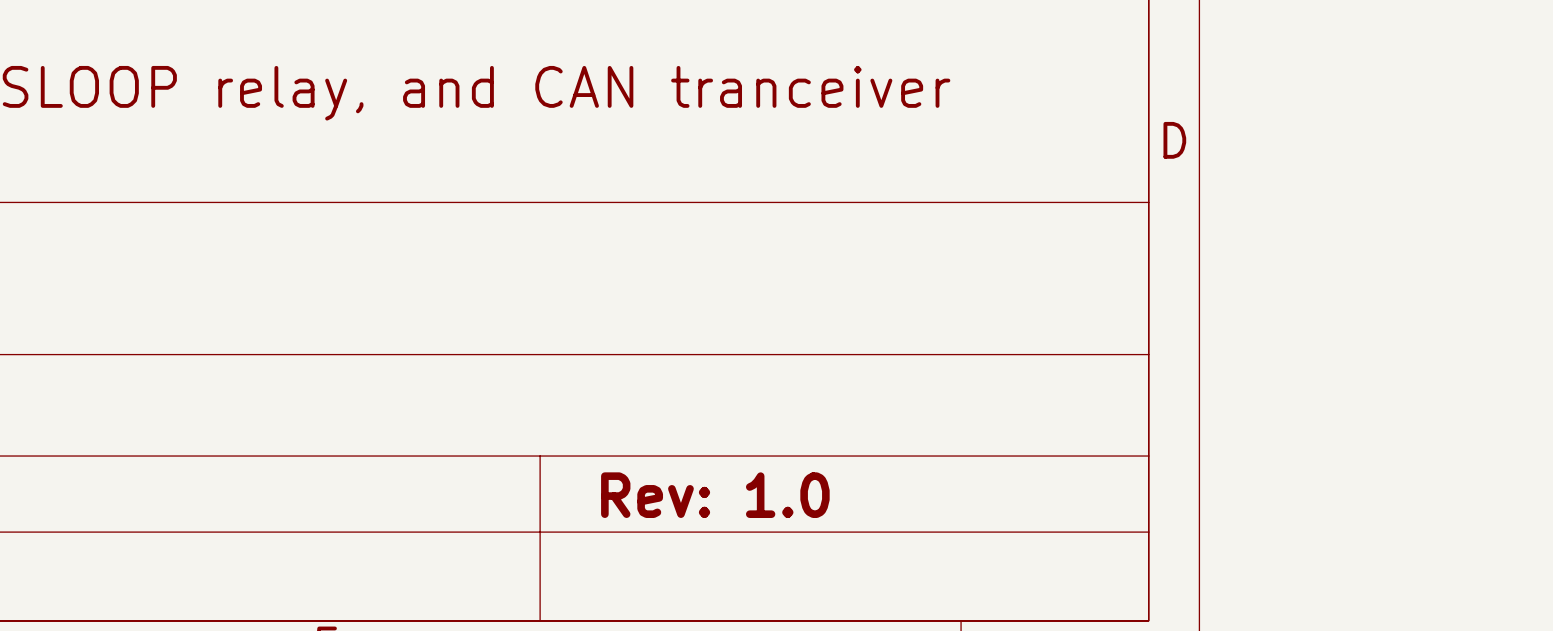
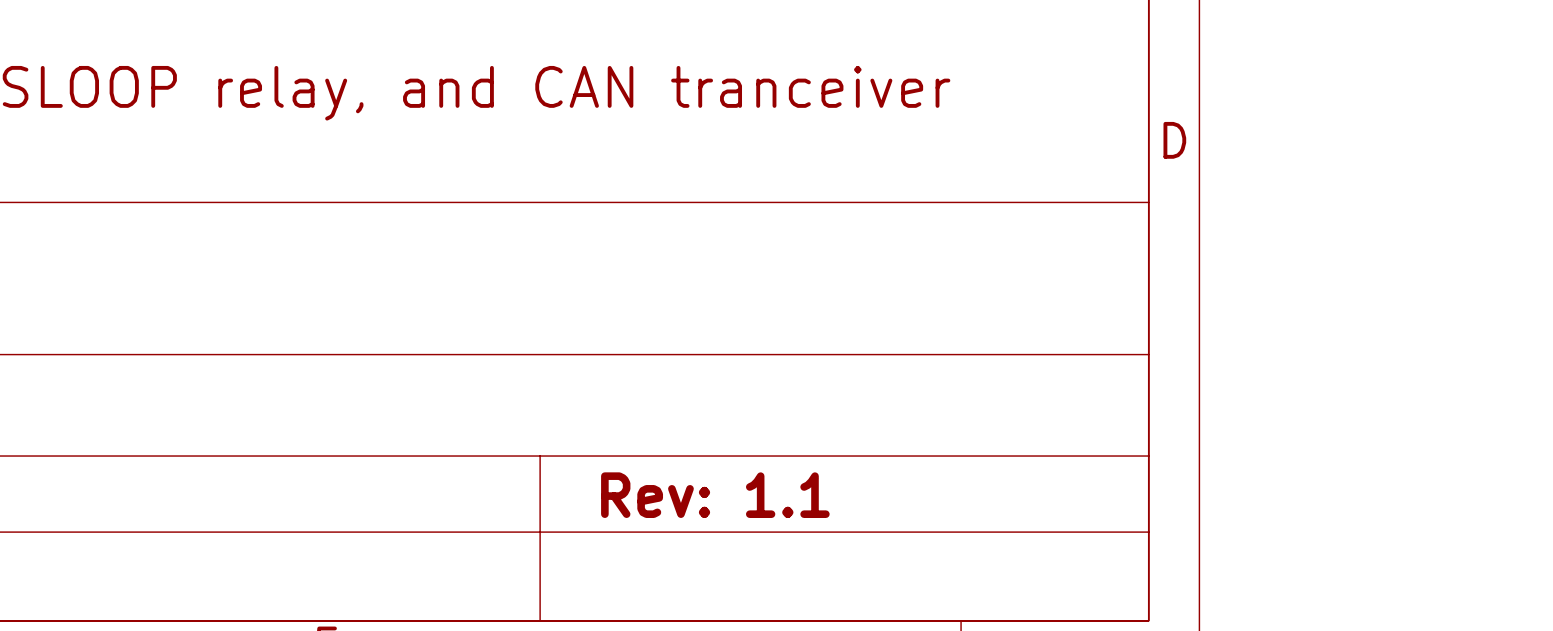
title block: Rev: 1.0 (715, 495) -> Rev: 1.1 (715, 495)

